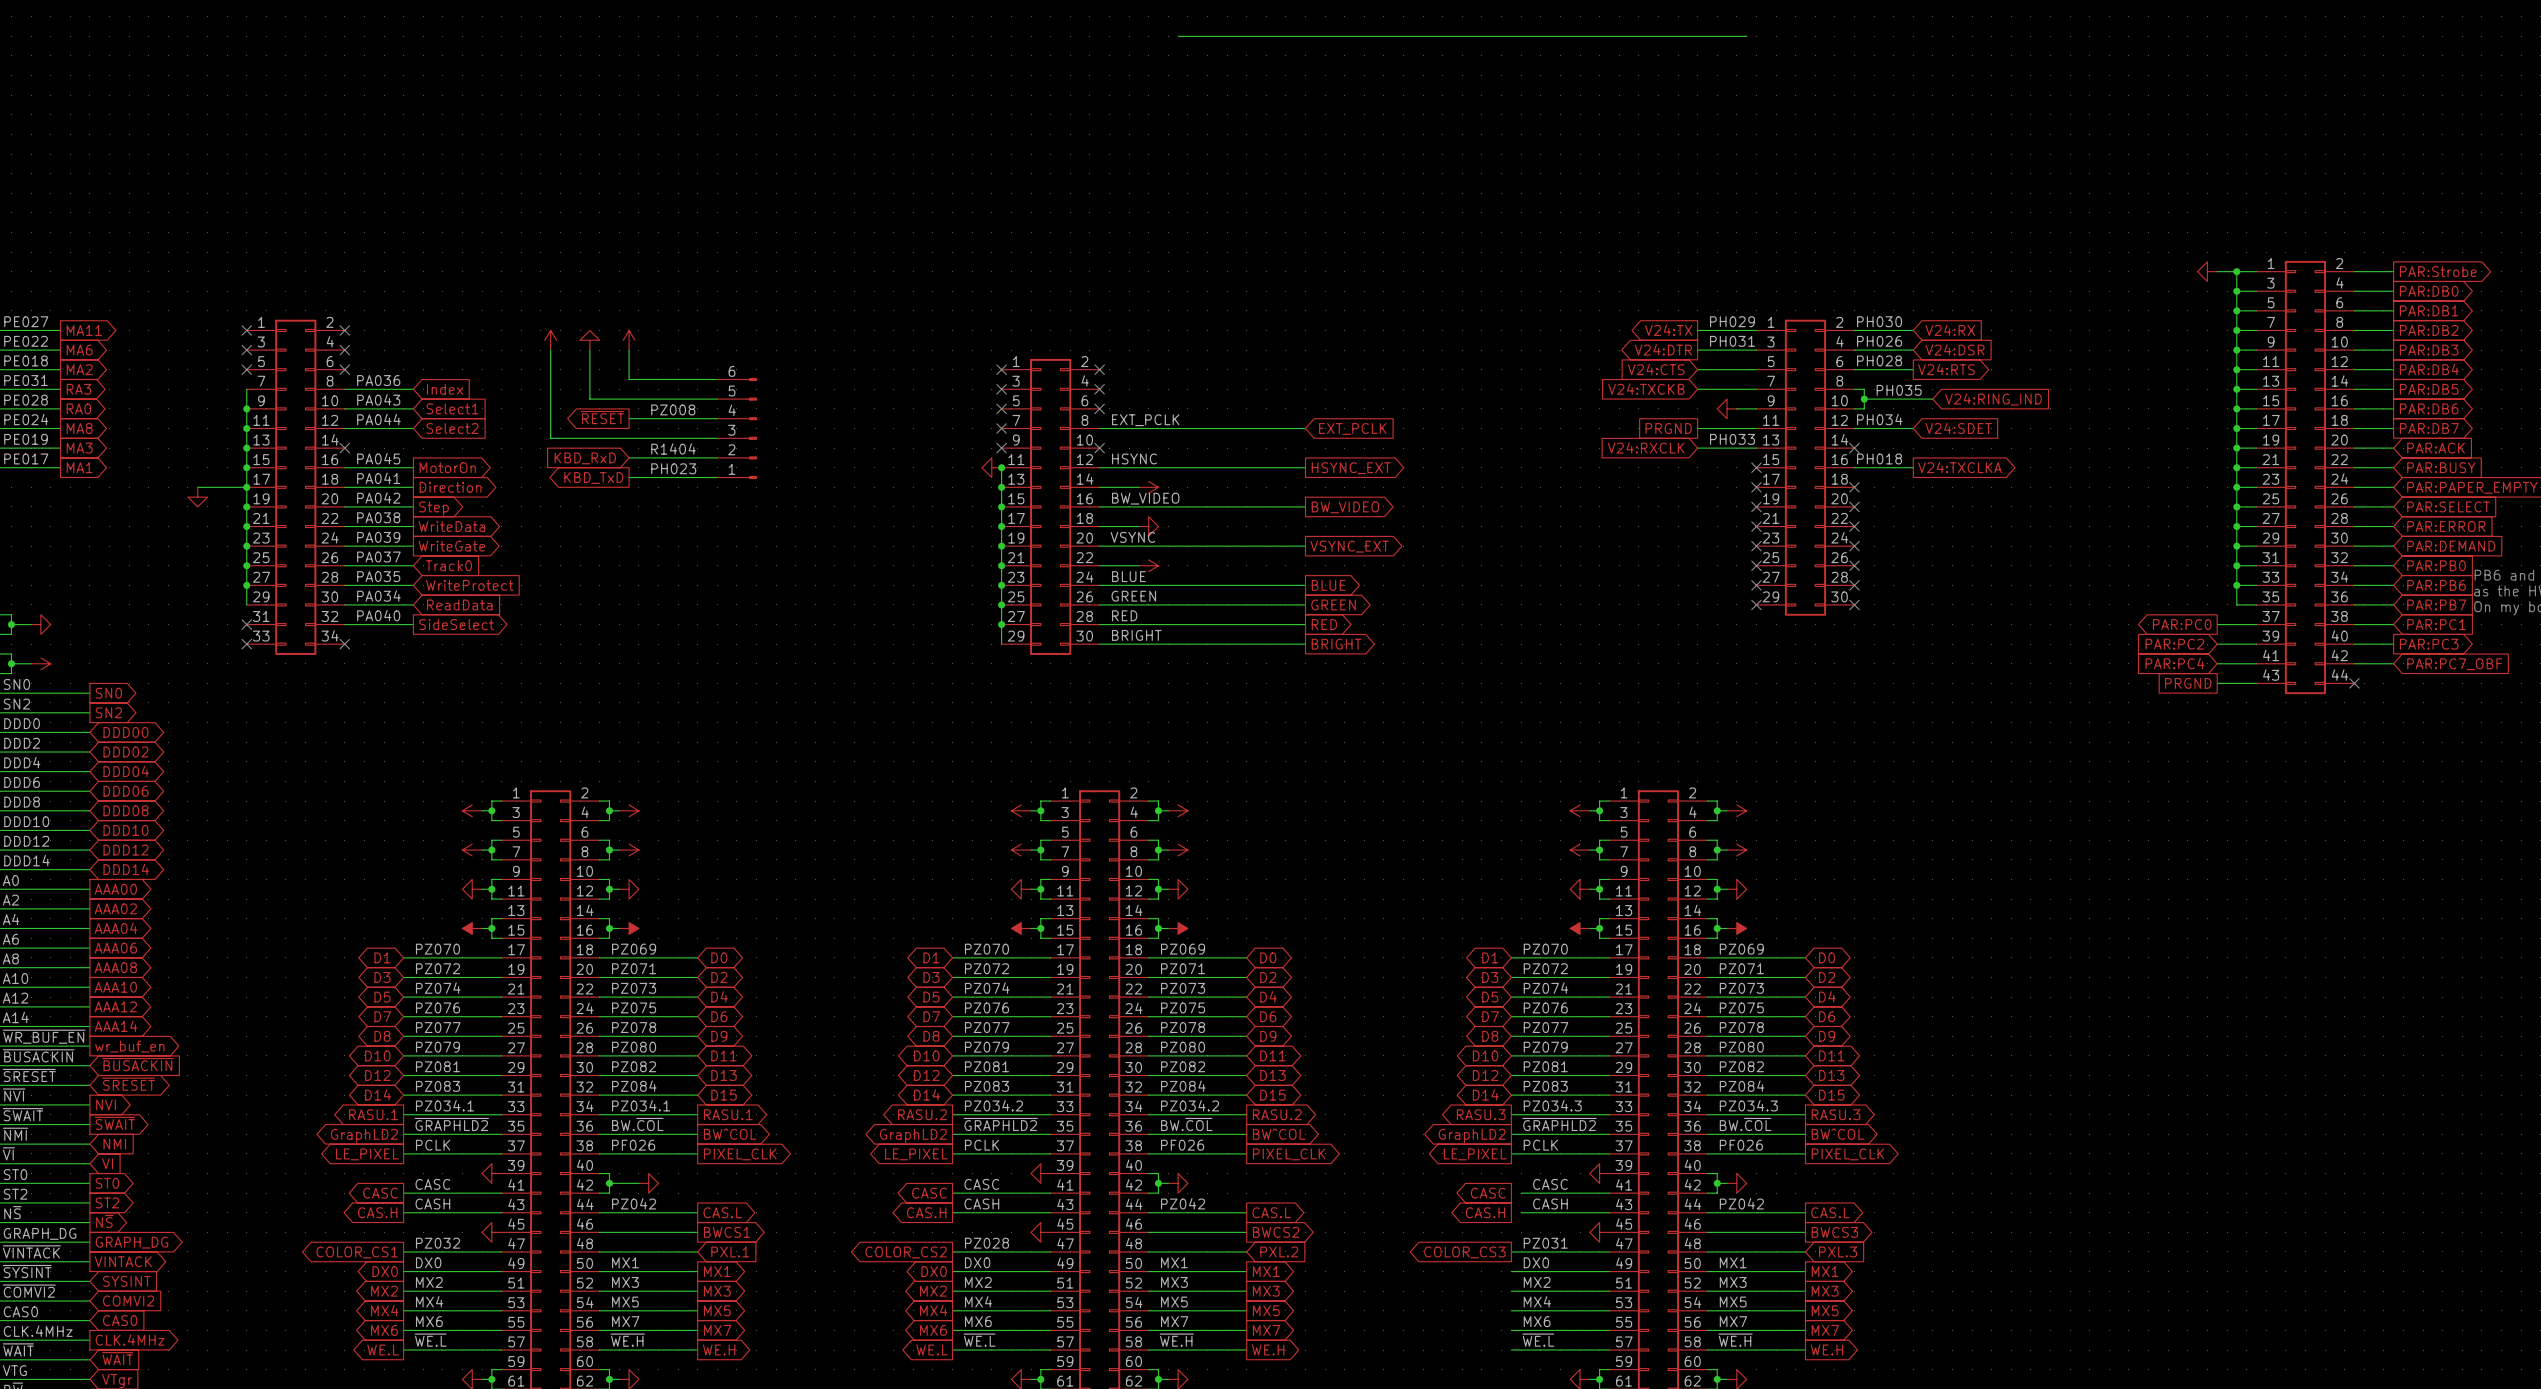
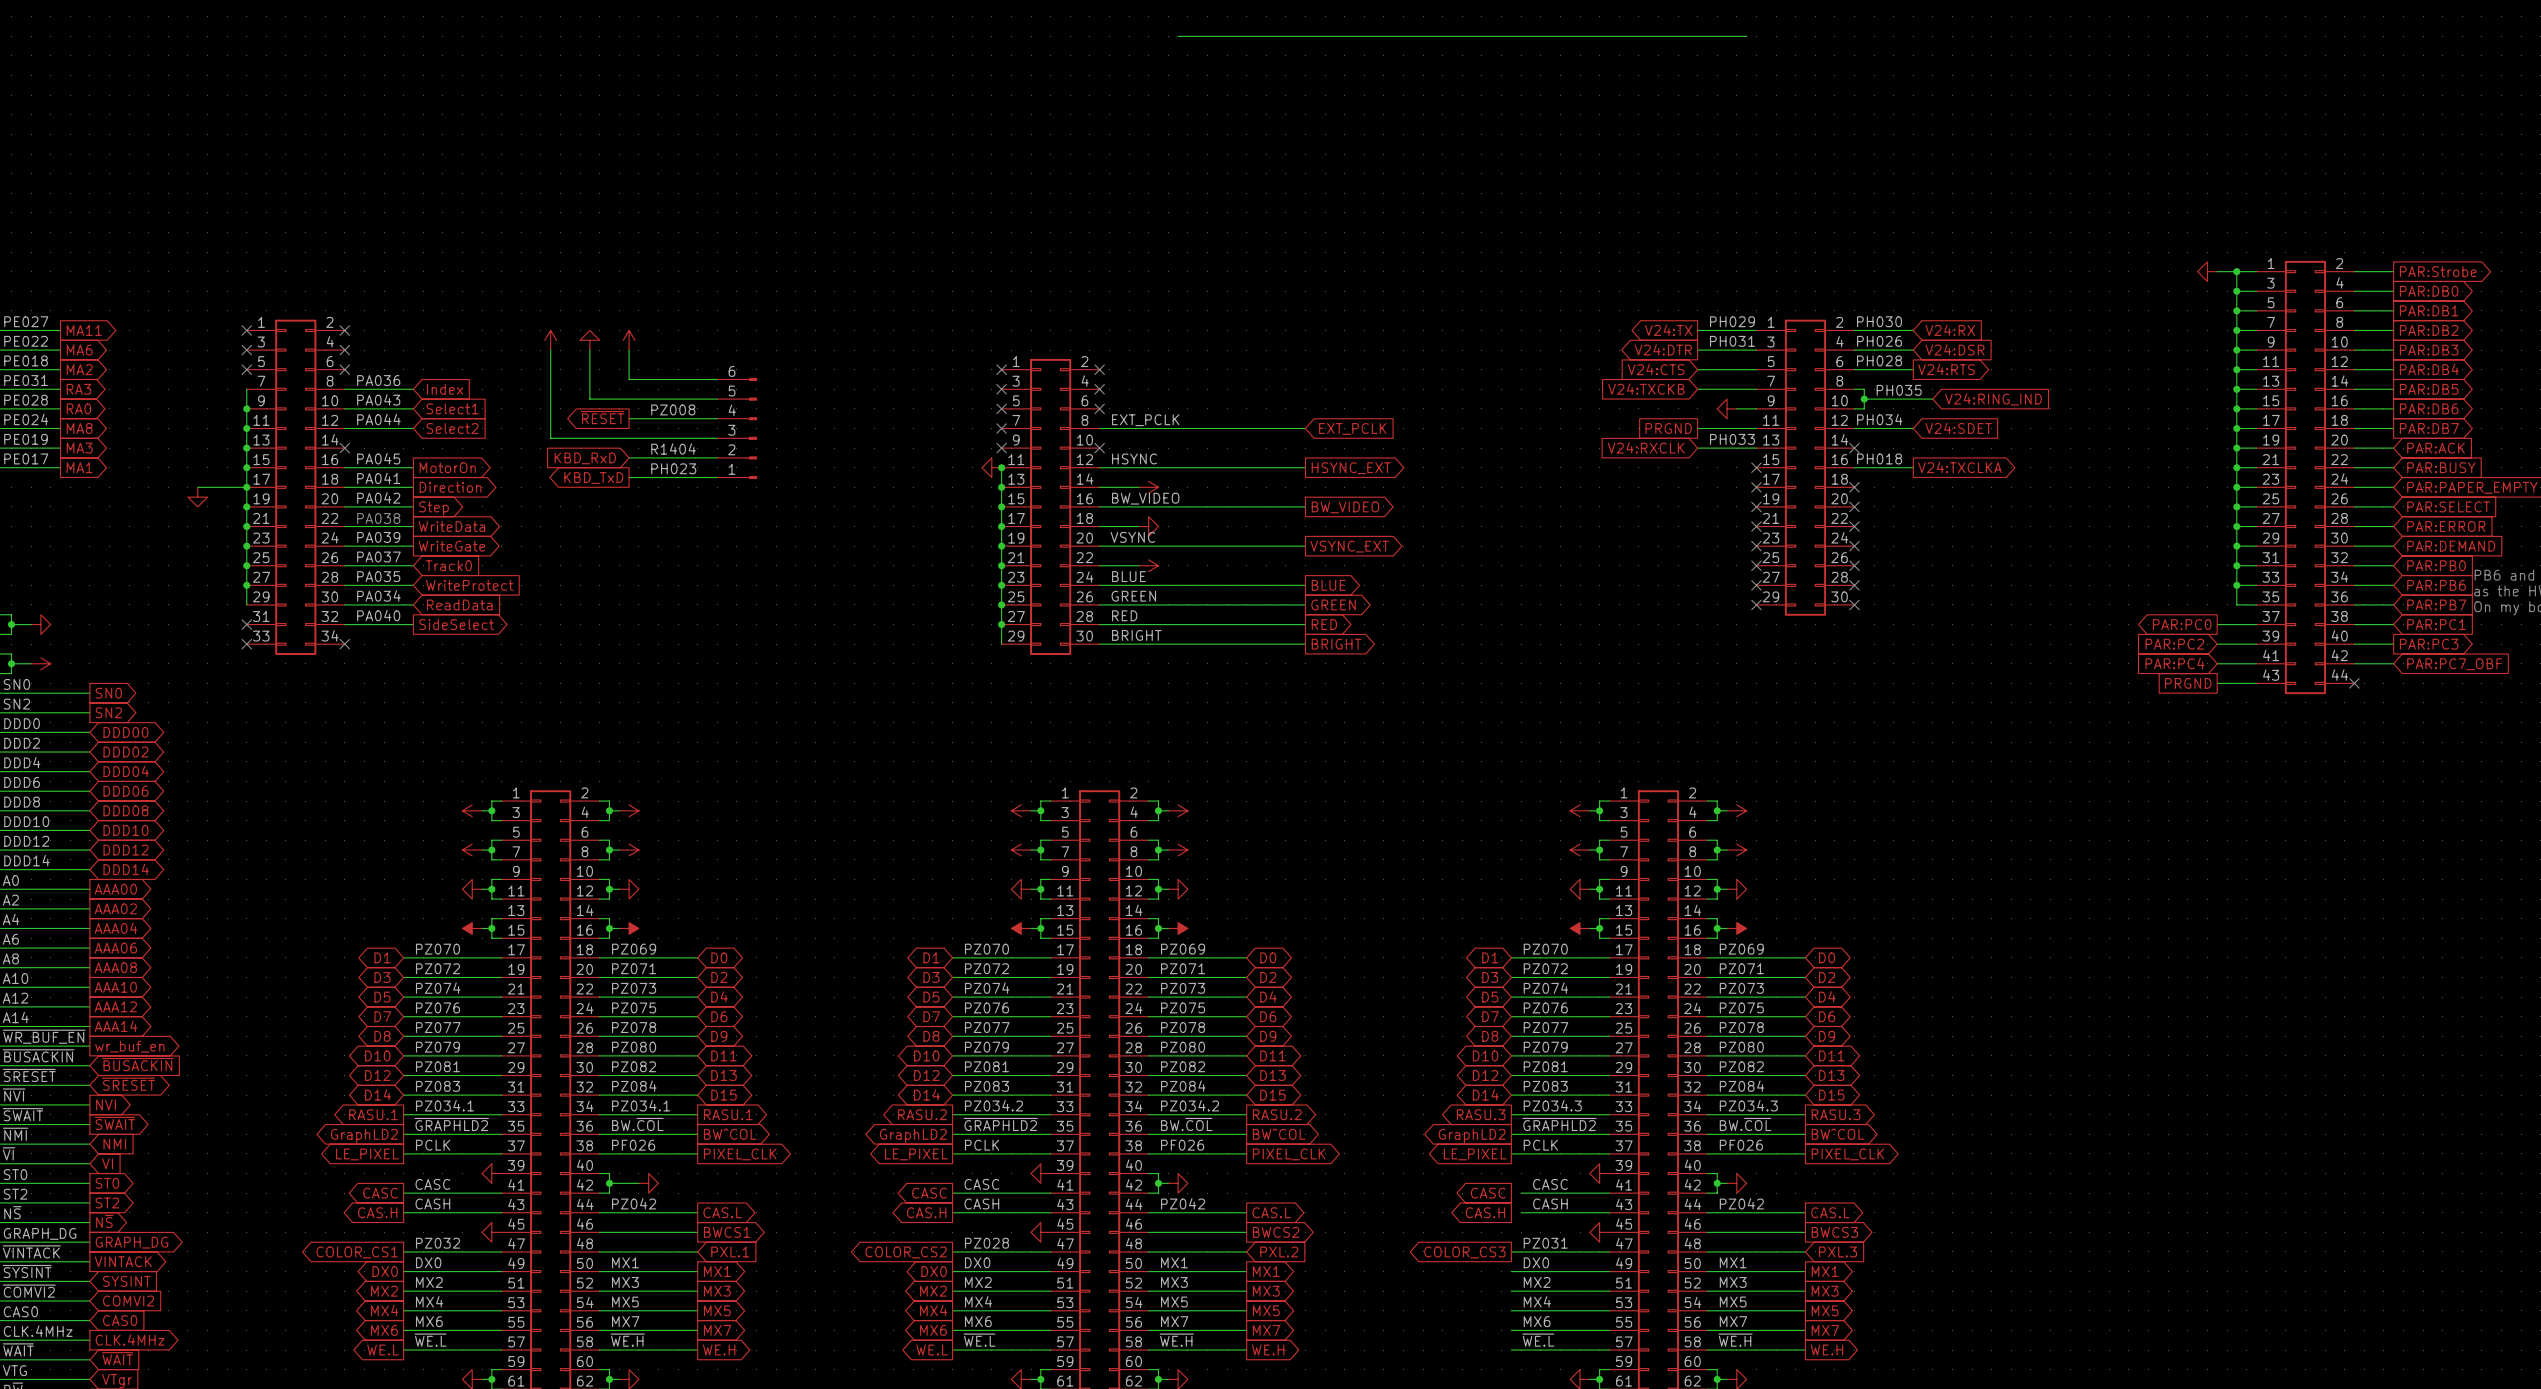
label: PA038 (378, 517) -> none
text: none -> PA038 (378, 518)

